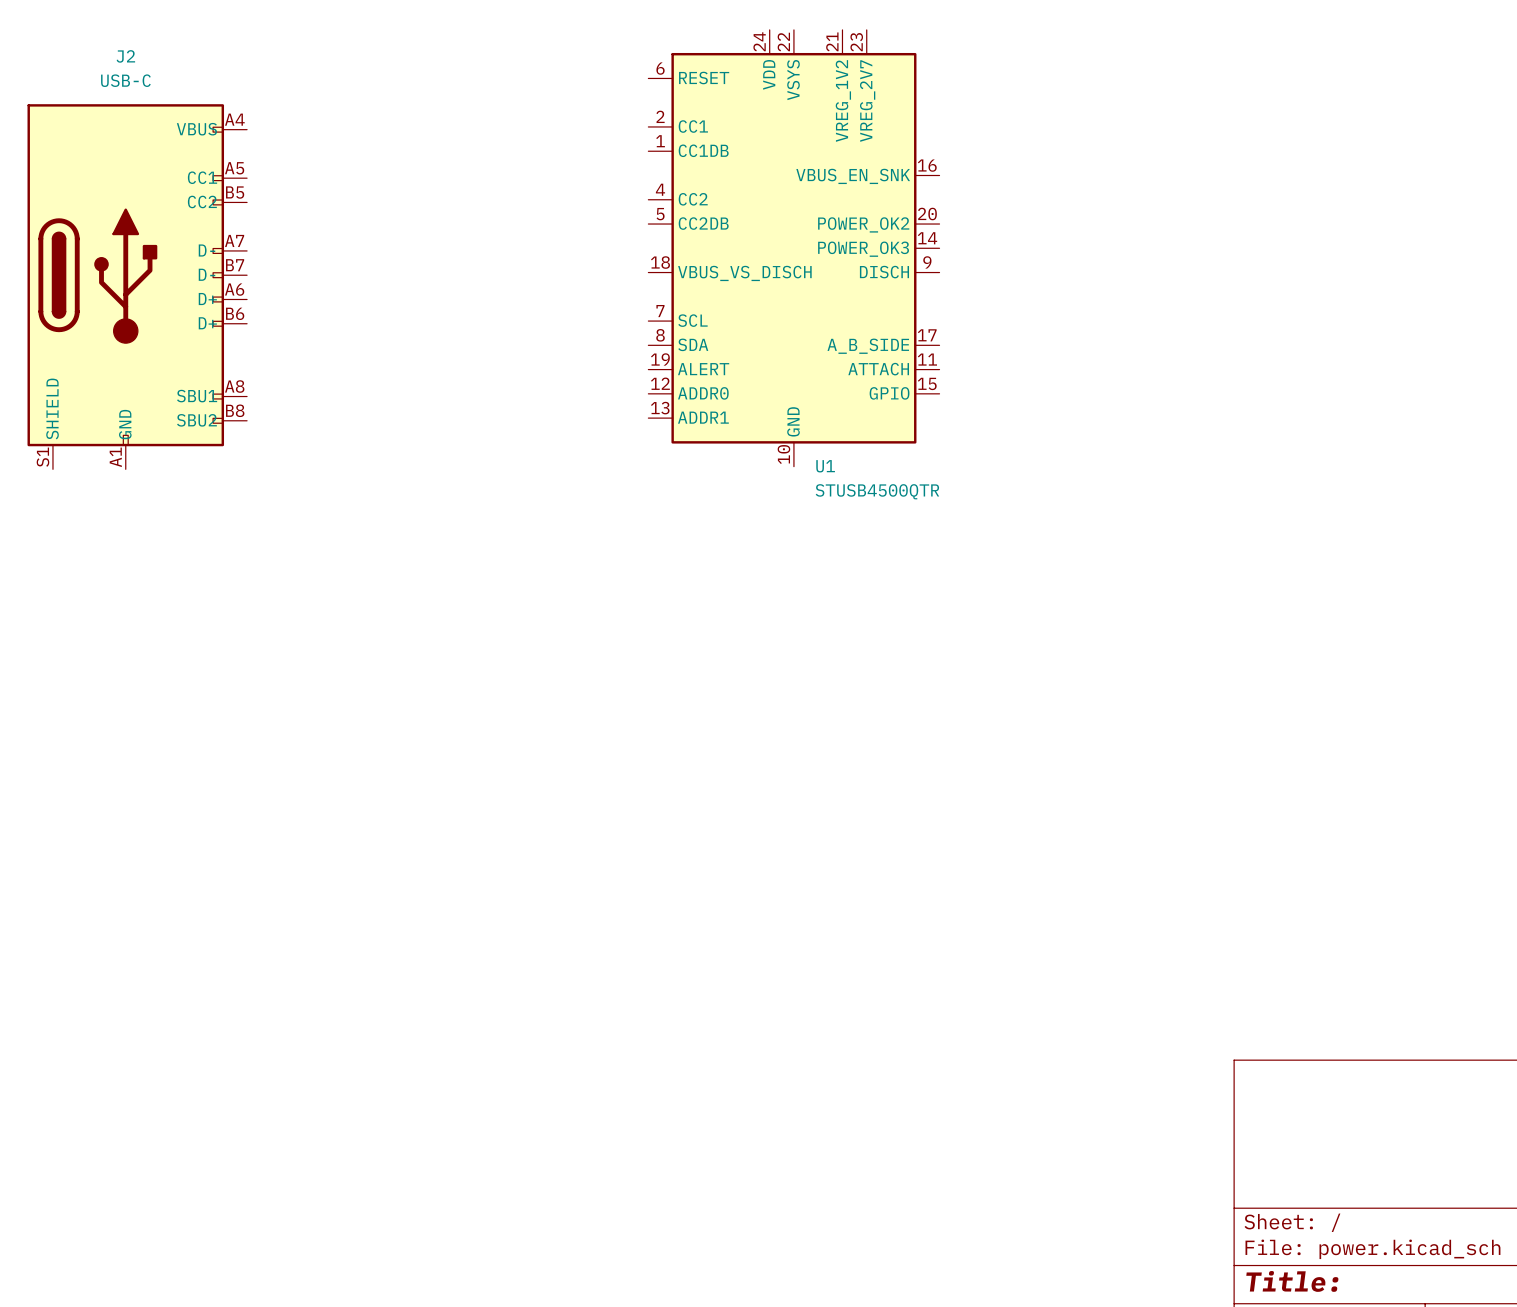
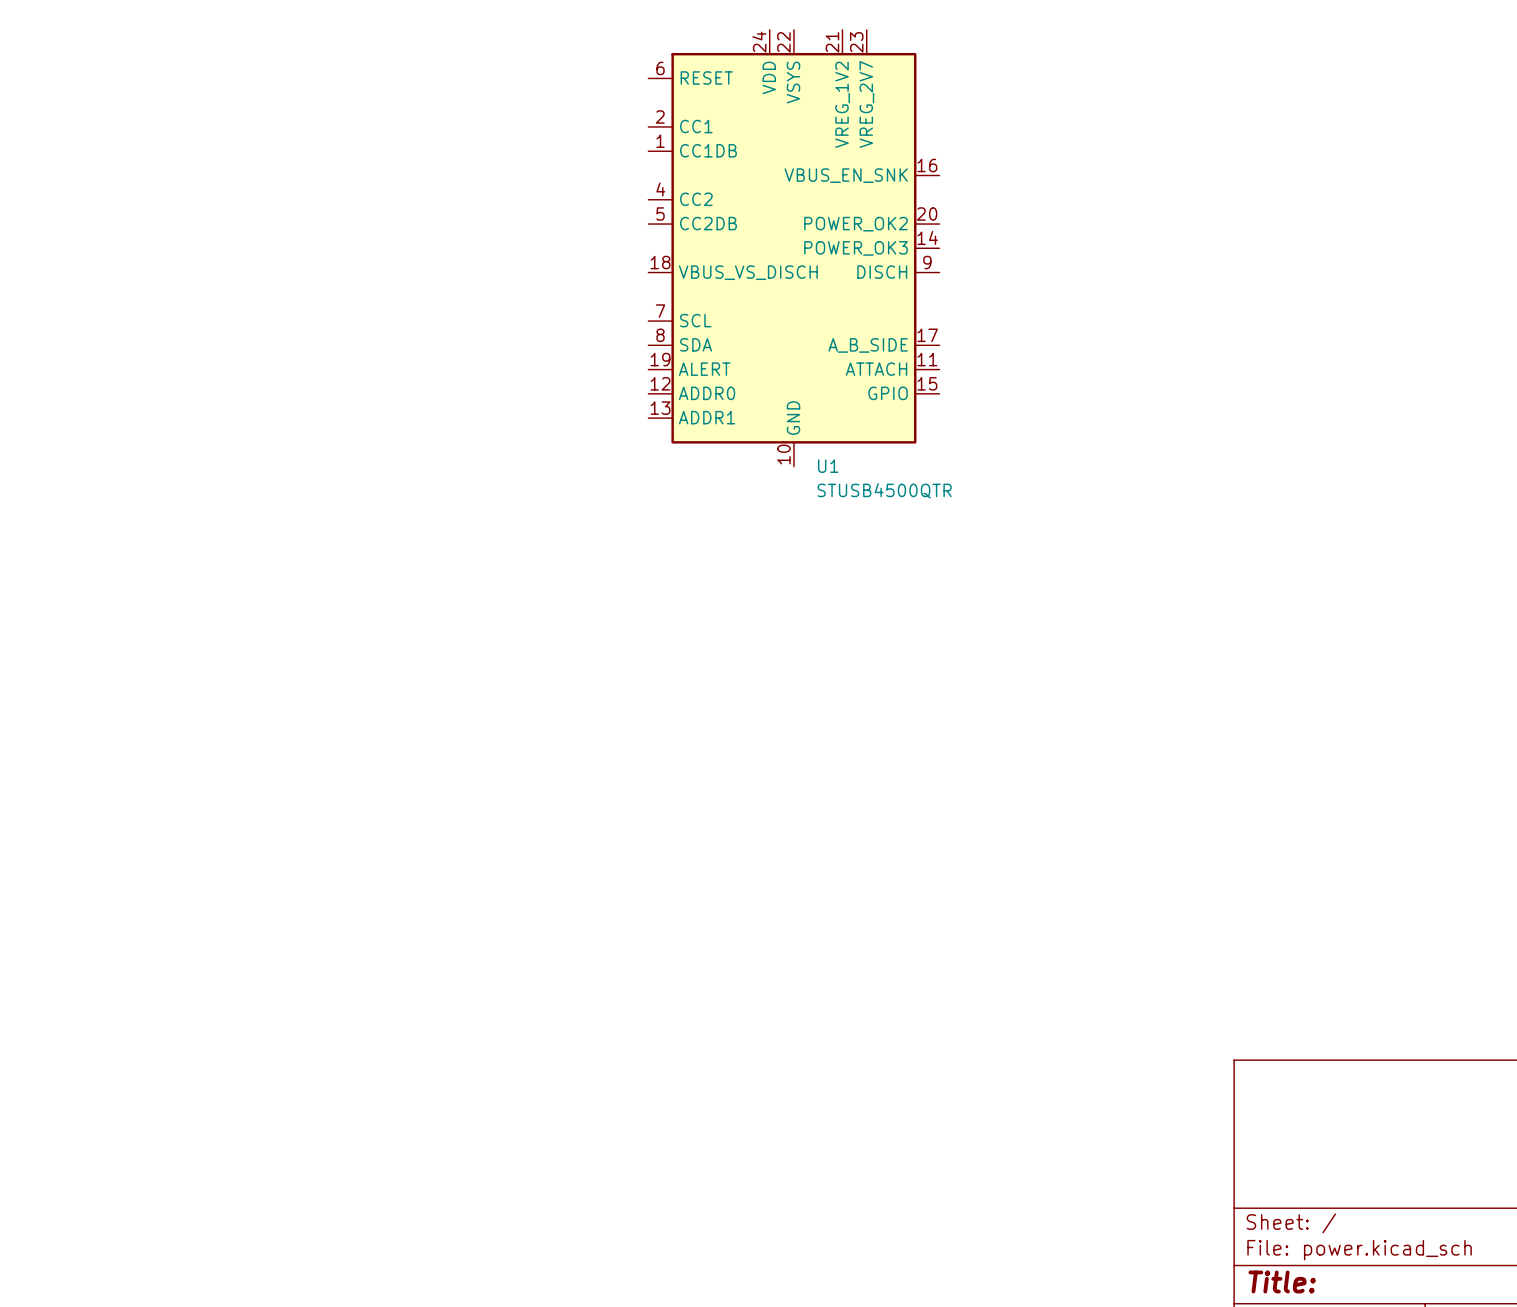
J2: USB-C (137, 286) -> none

